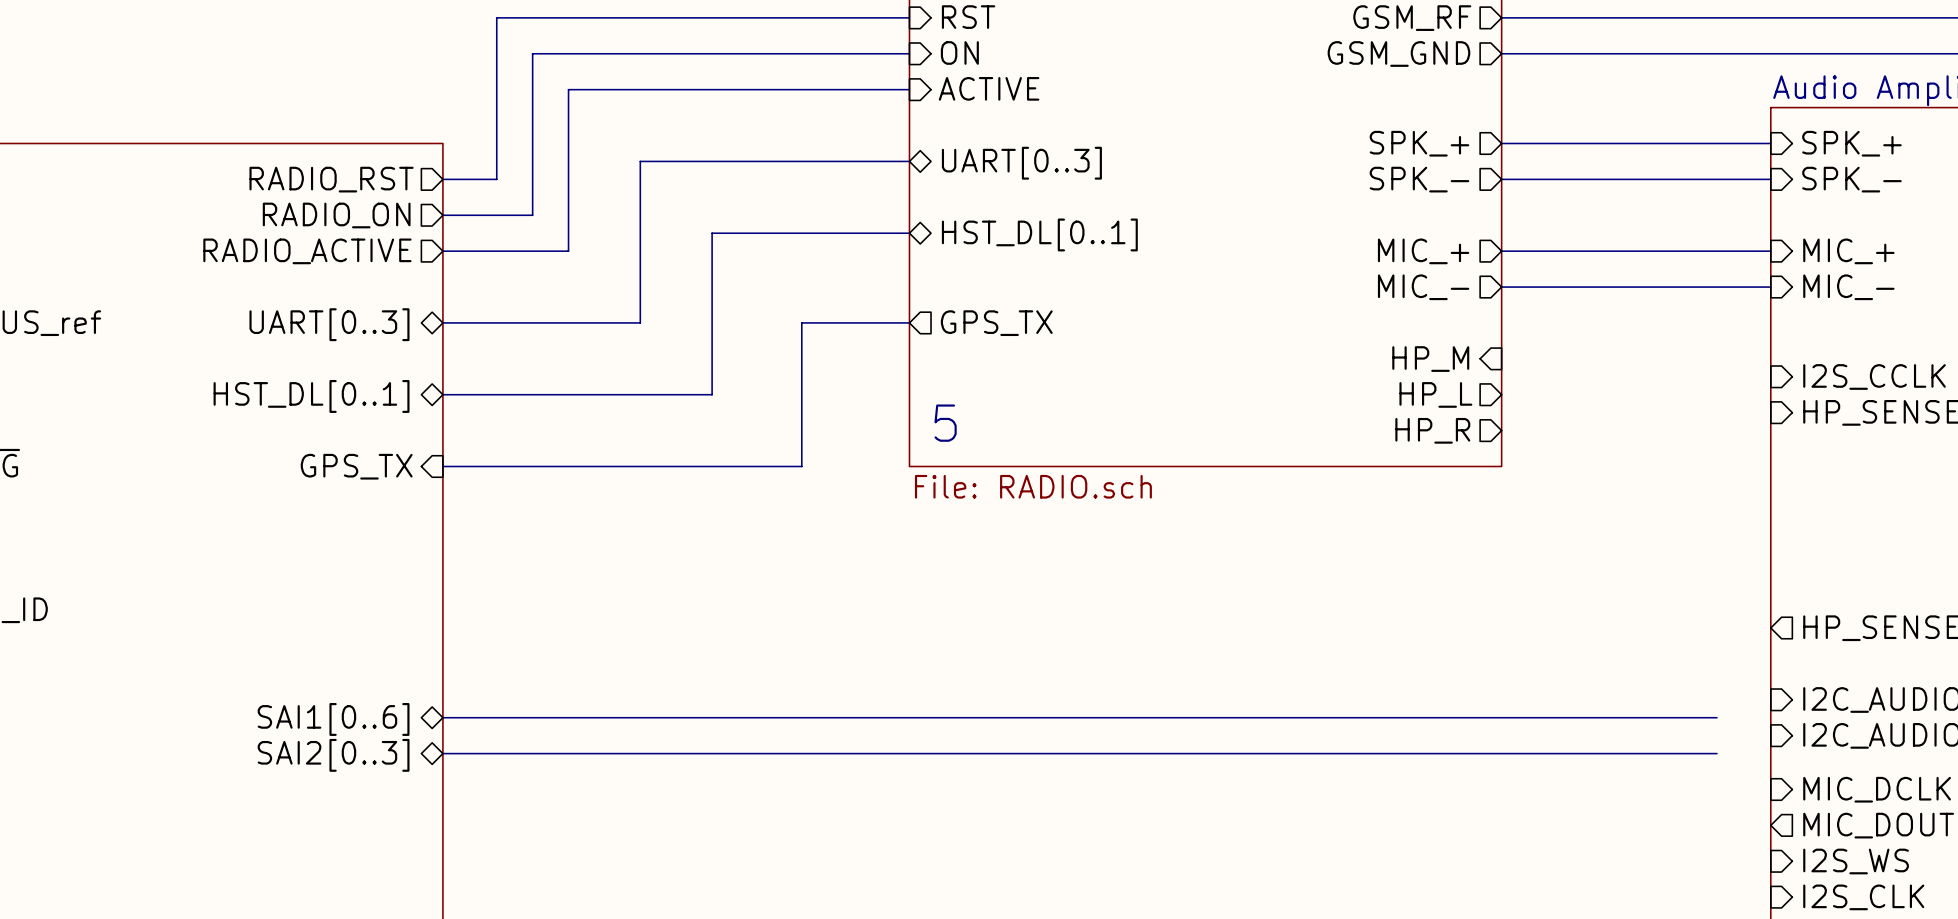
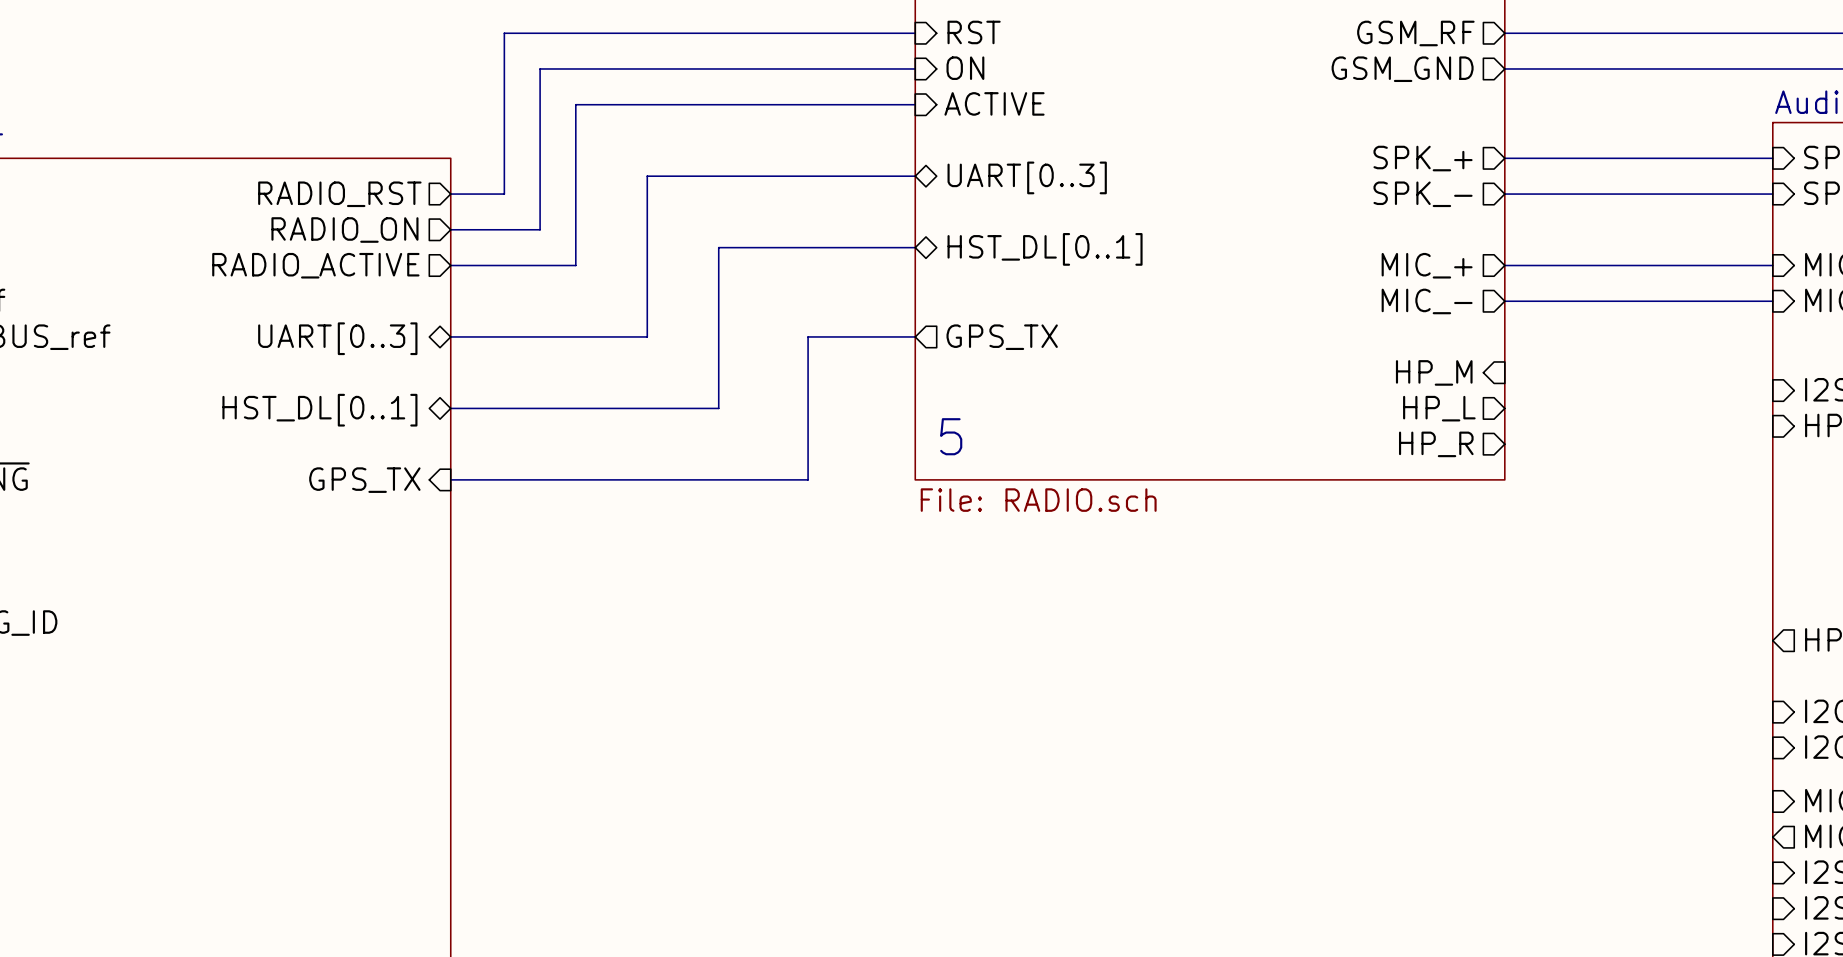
bus: (442, 717) (1716, 717) -> none
sheet pin: SAI1[0..6] (333, 719) -> none
bus: (442, 753) (1716, 753) -> none
sheet pin: SAI2[0..3] (333, 755) -> none

